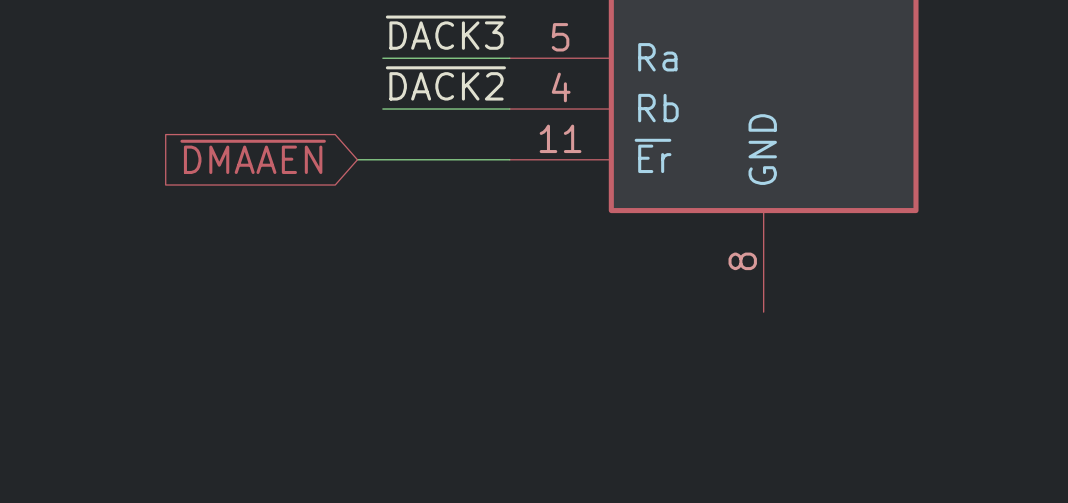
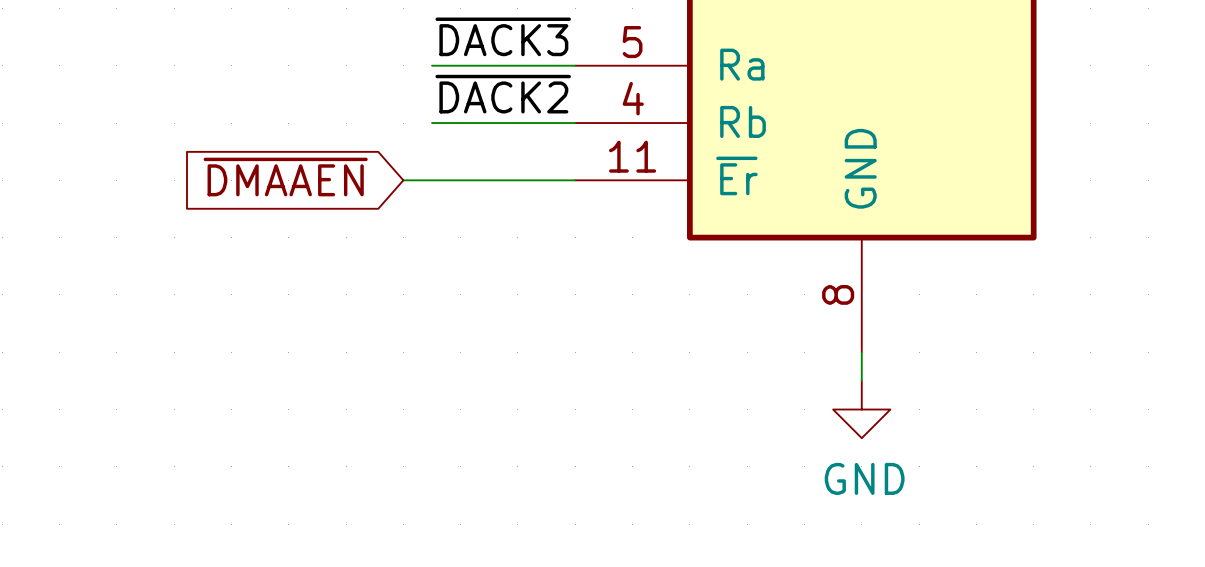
wire: none -> (861, 352) (861, 380)
power symbol: none -> GND (861, 409)

